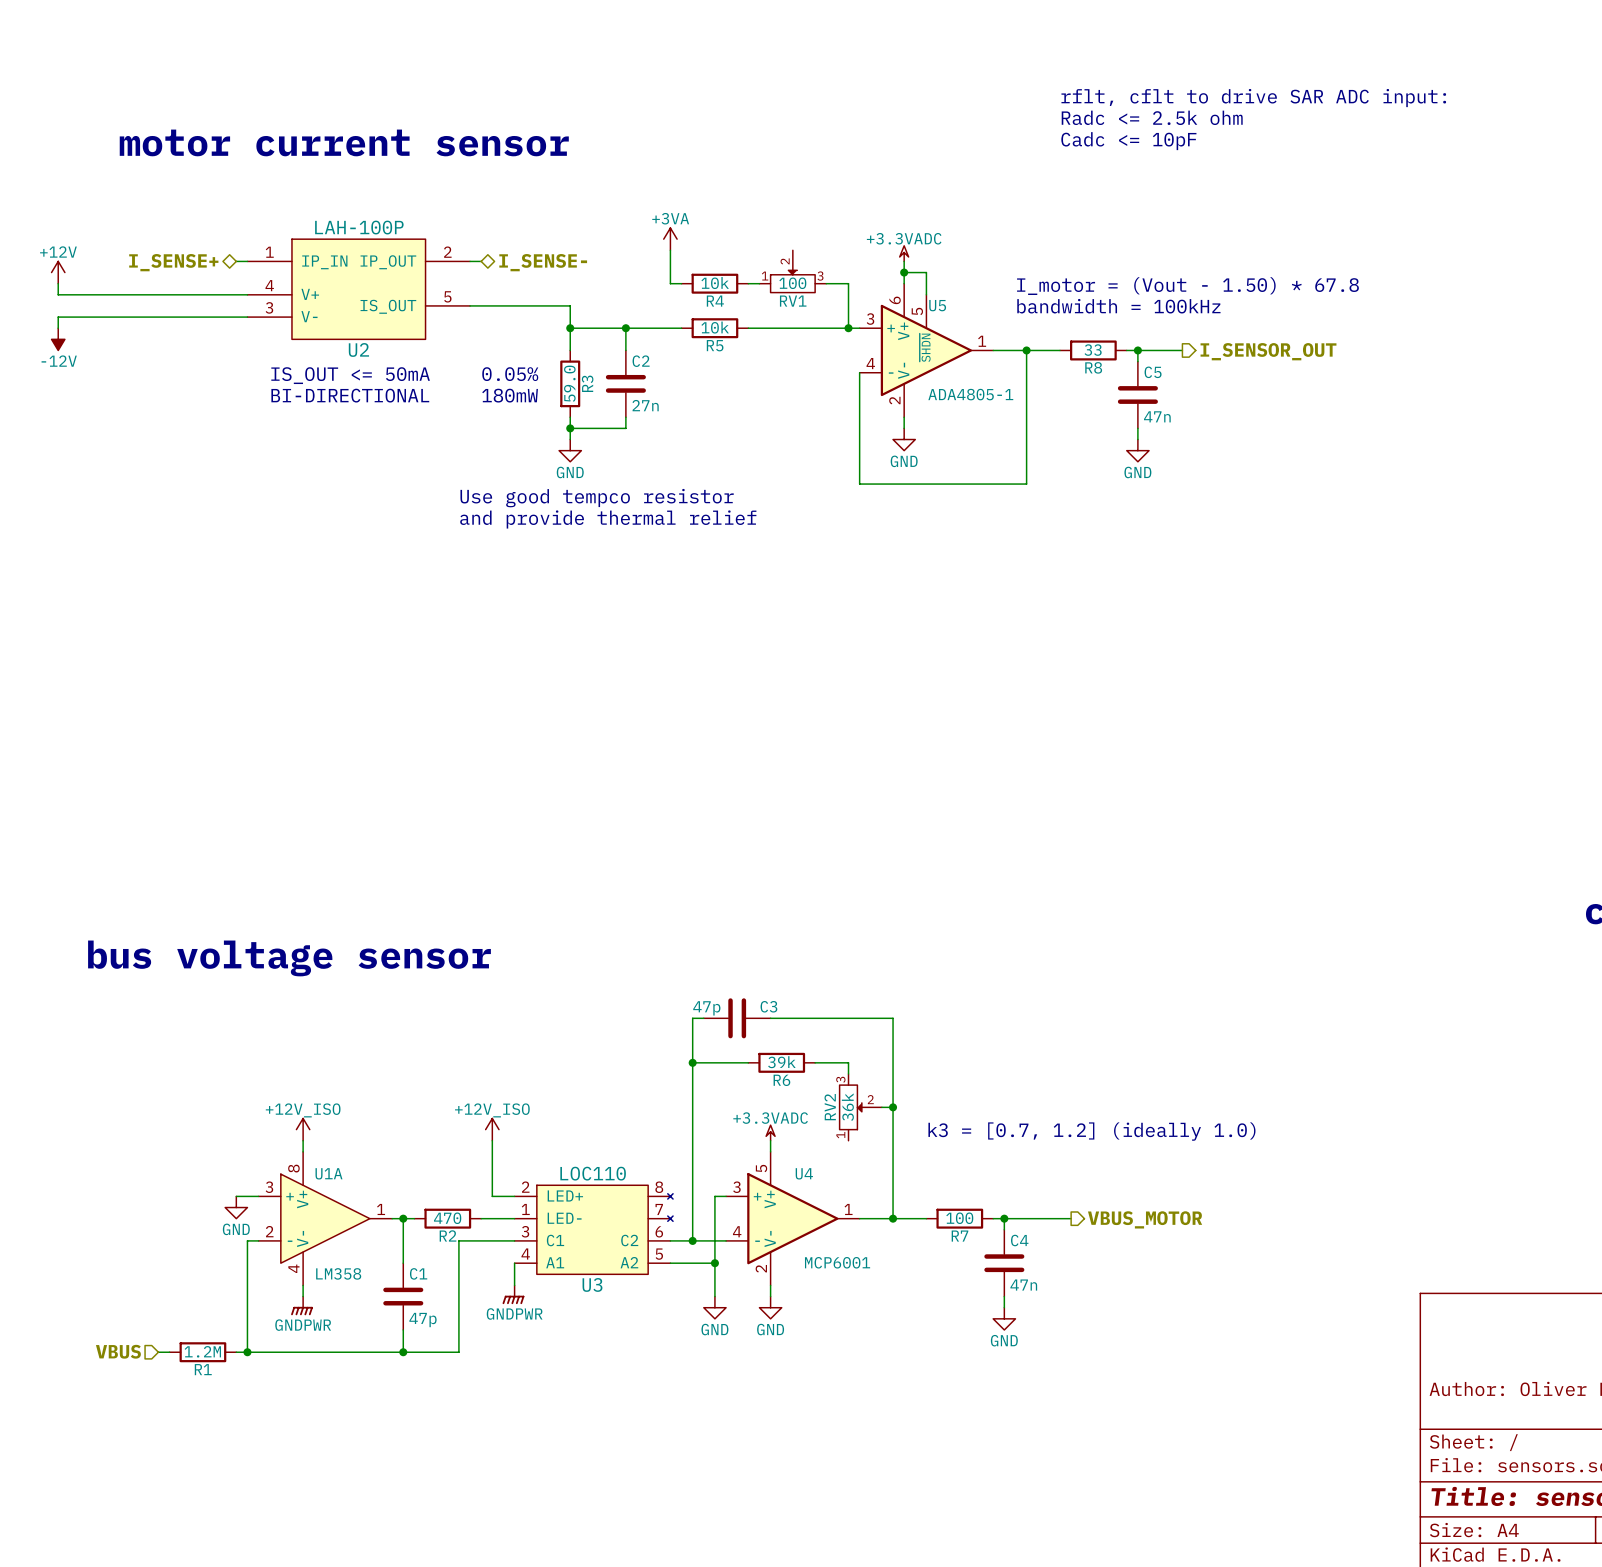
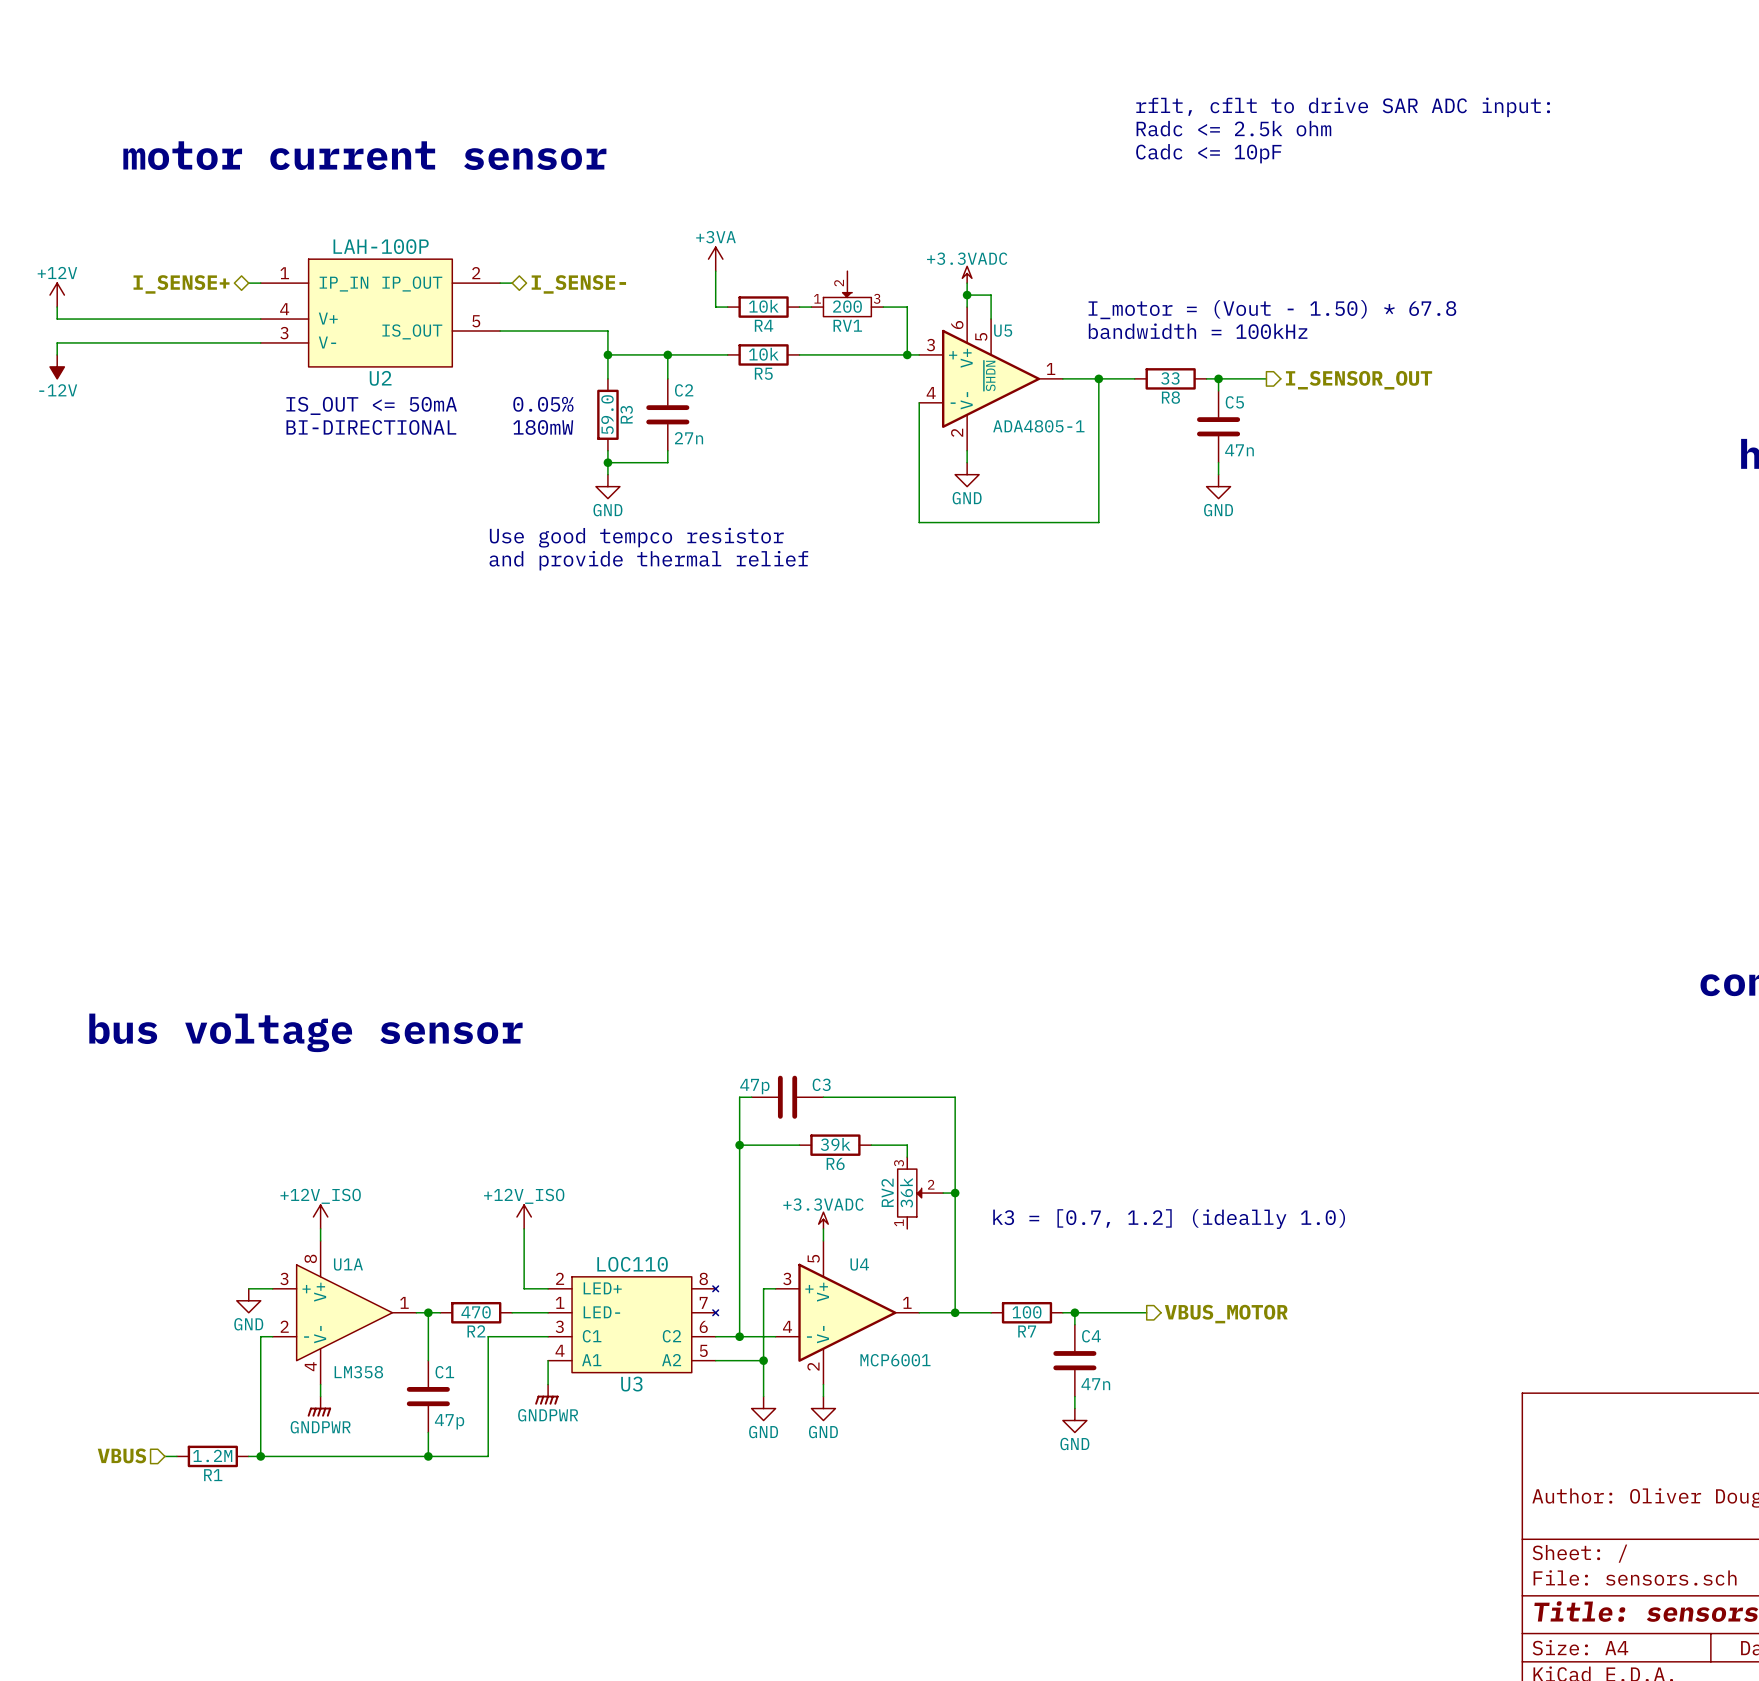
RV1 value: 100 (792, 283) -> 200 (847, 306)

